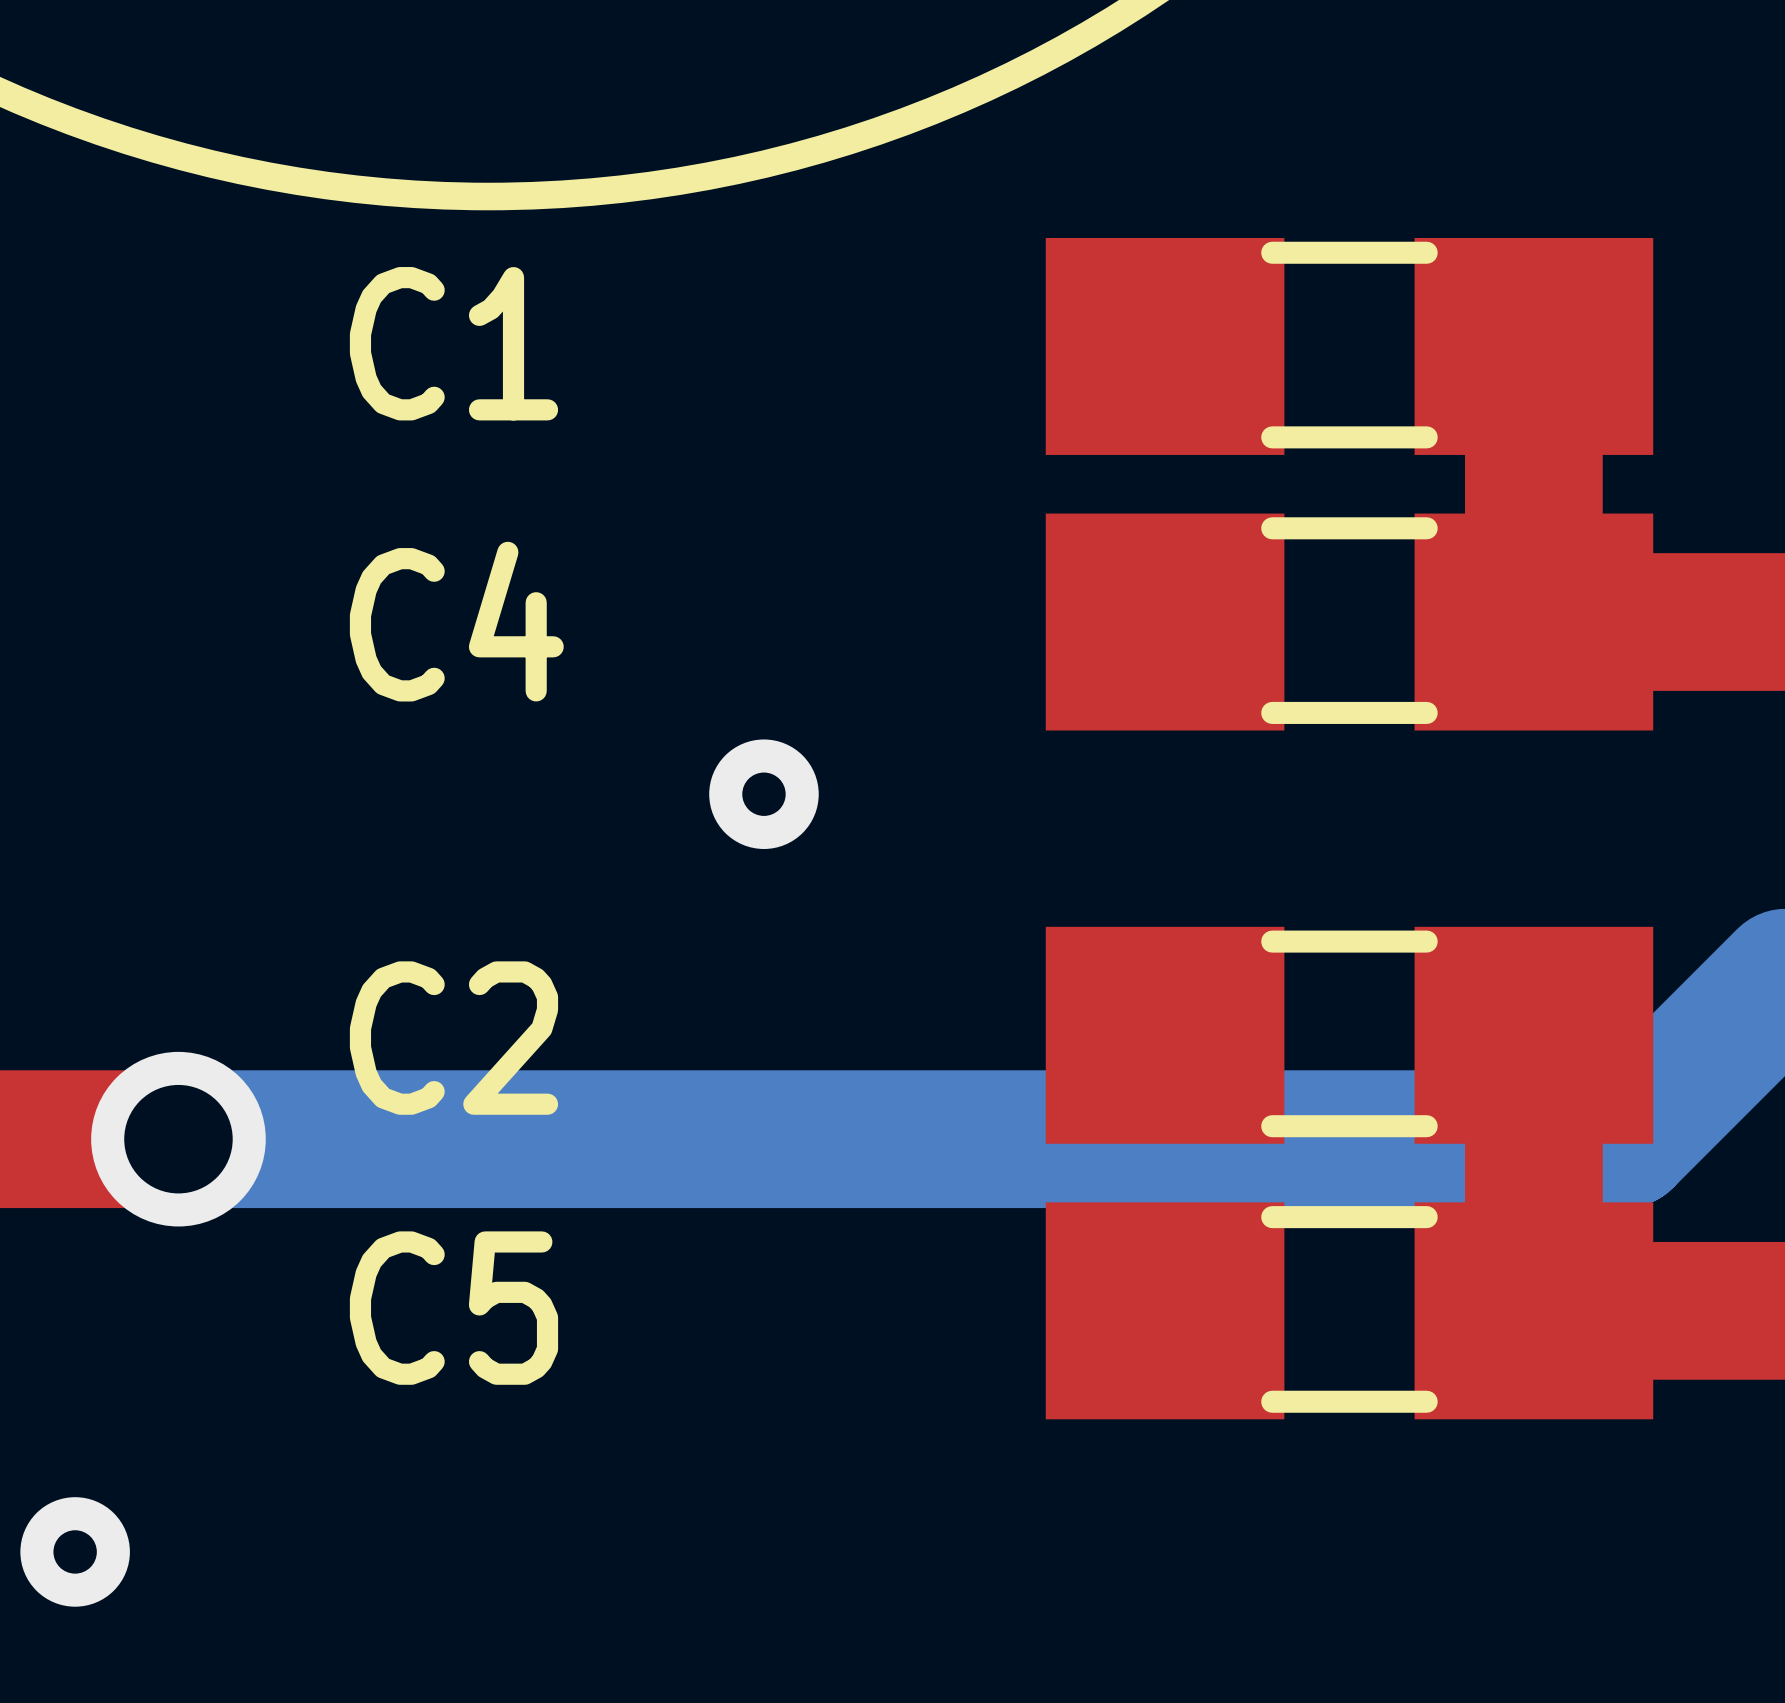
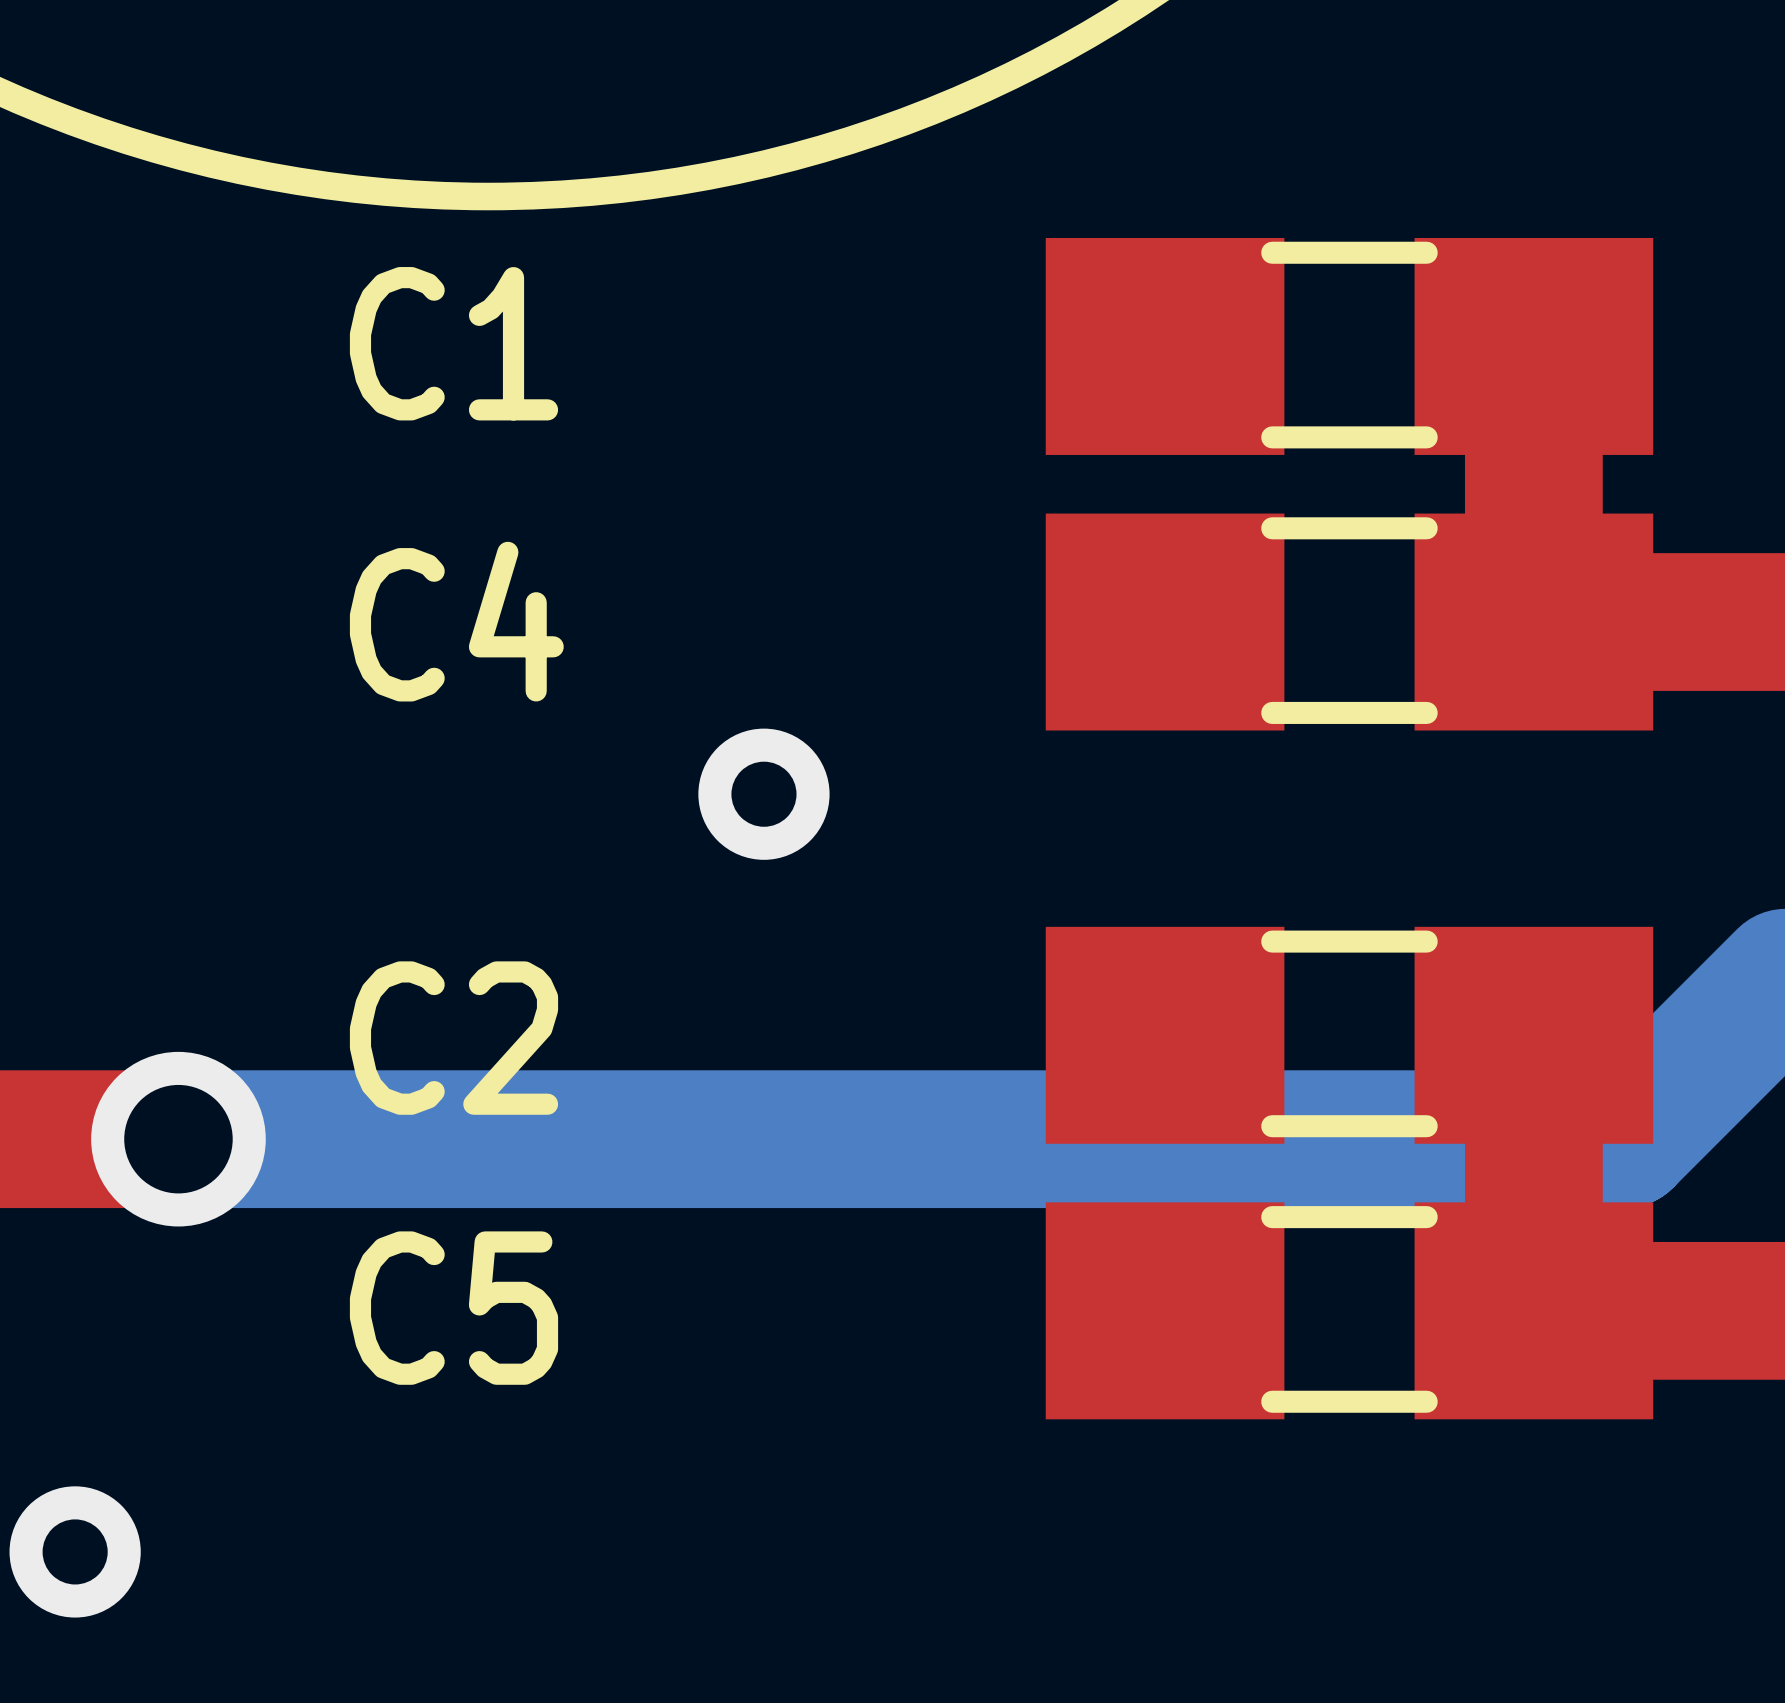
via size: [709, 739, 819, 849] -> [698, 728, 830, 860]
via size: [20, 1497, 130, 1607] -> [9, 1486, 141, 1618]

